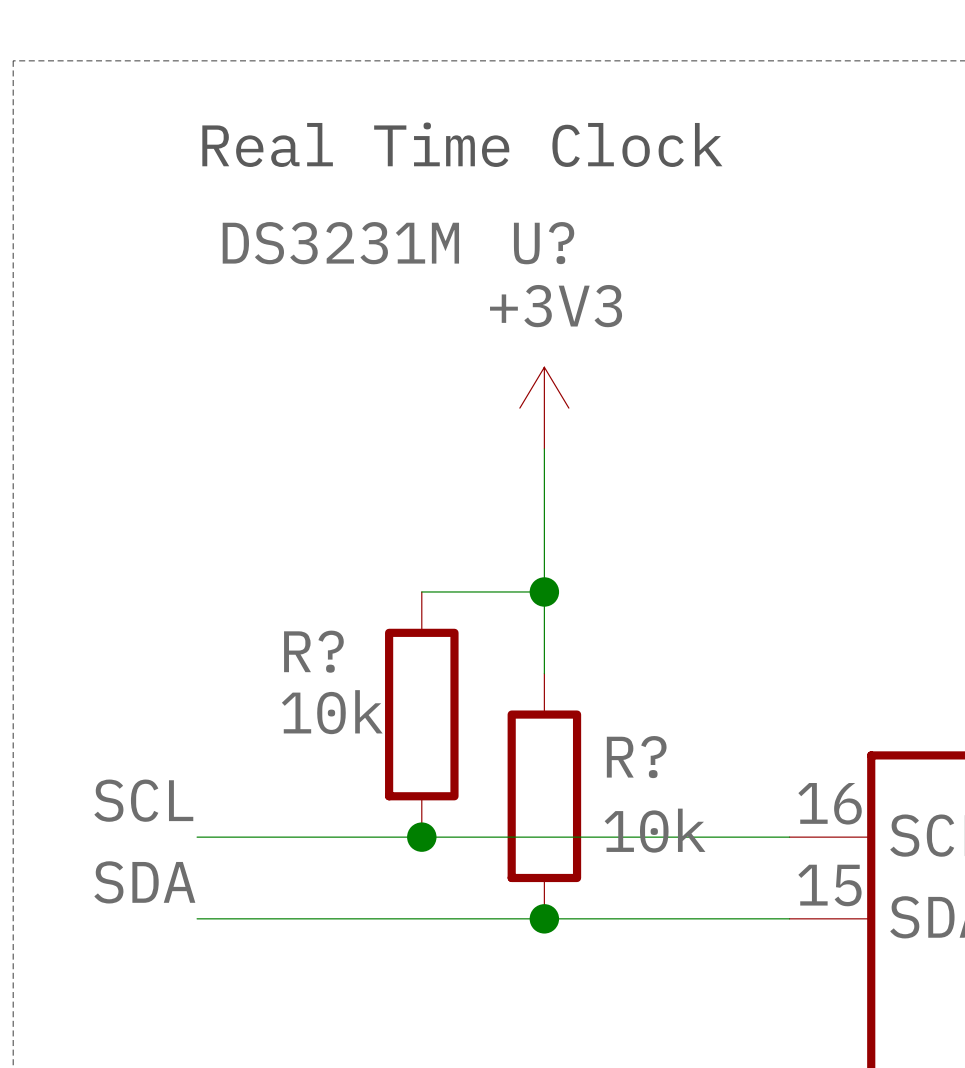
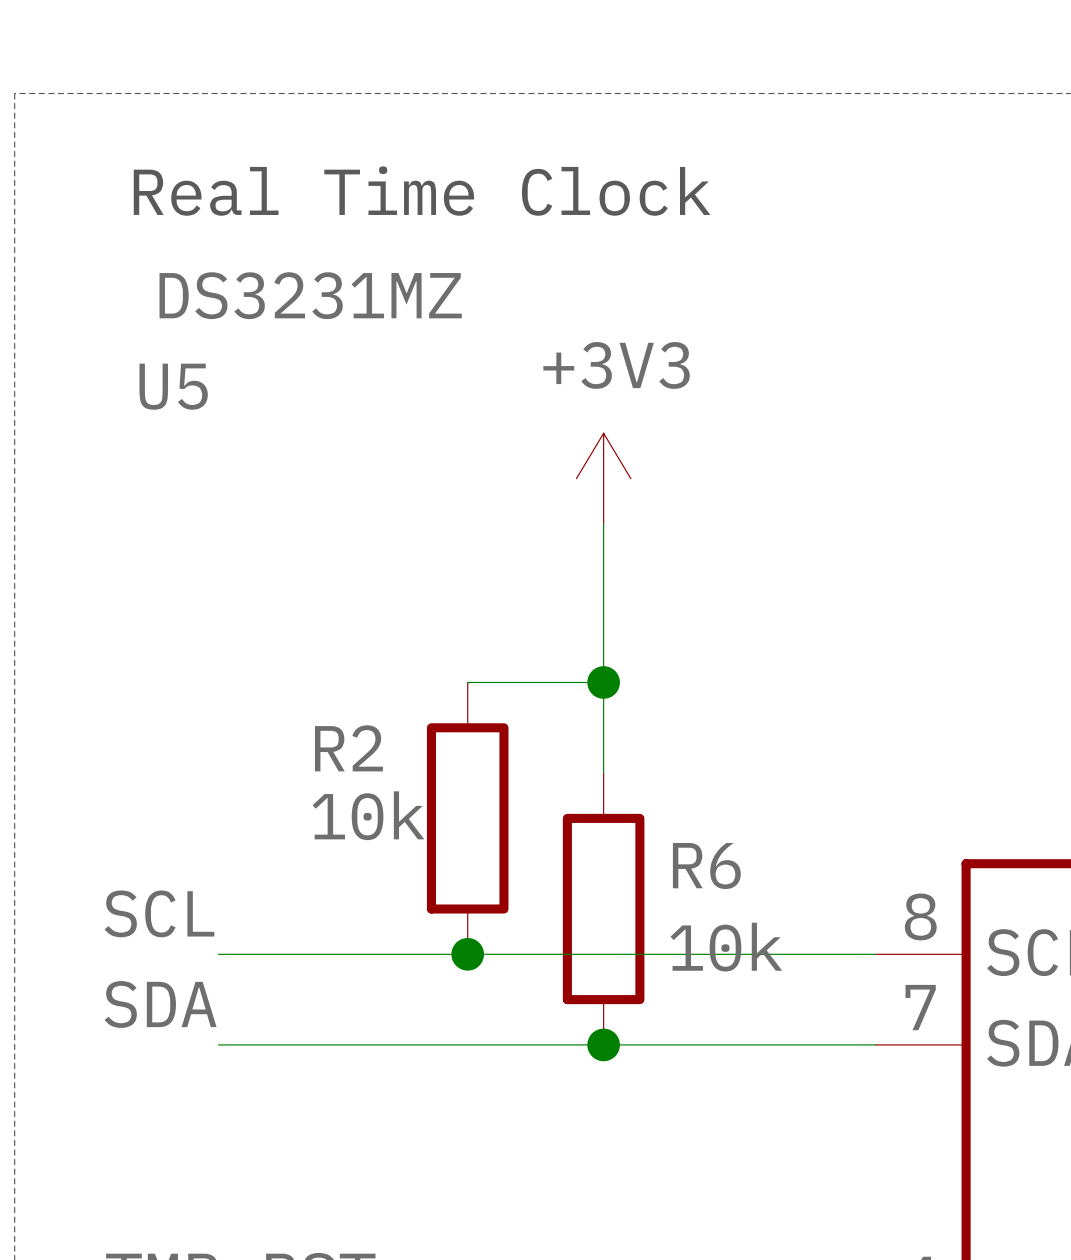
text position: Real Time Clock (462, 144) -> Real Time Clock (422, 191)
U? value: DS3231M (340, 243) -> DS3231MZ (310, 295)
U? name: U? (544, 243) -> U5 (173, 386)
R? name: R? (313, 651) -> R2 (348, 748)
R? name: R? (636, 757) -> R6 (706, 866)
U? pin number: 16 (830, 803) -> 8 (920, 916)
U? pin number: 15 (829, 885) -> 7 (920, 1007)

